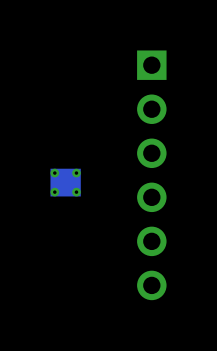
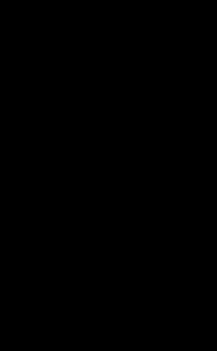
part: (151, 175) -> none
part: (65, 182) -> none

